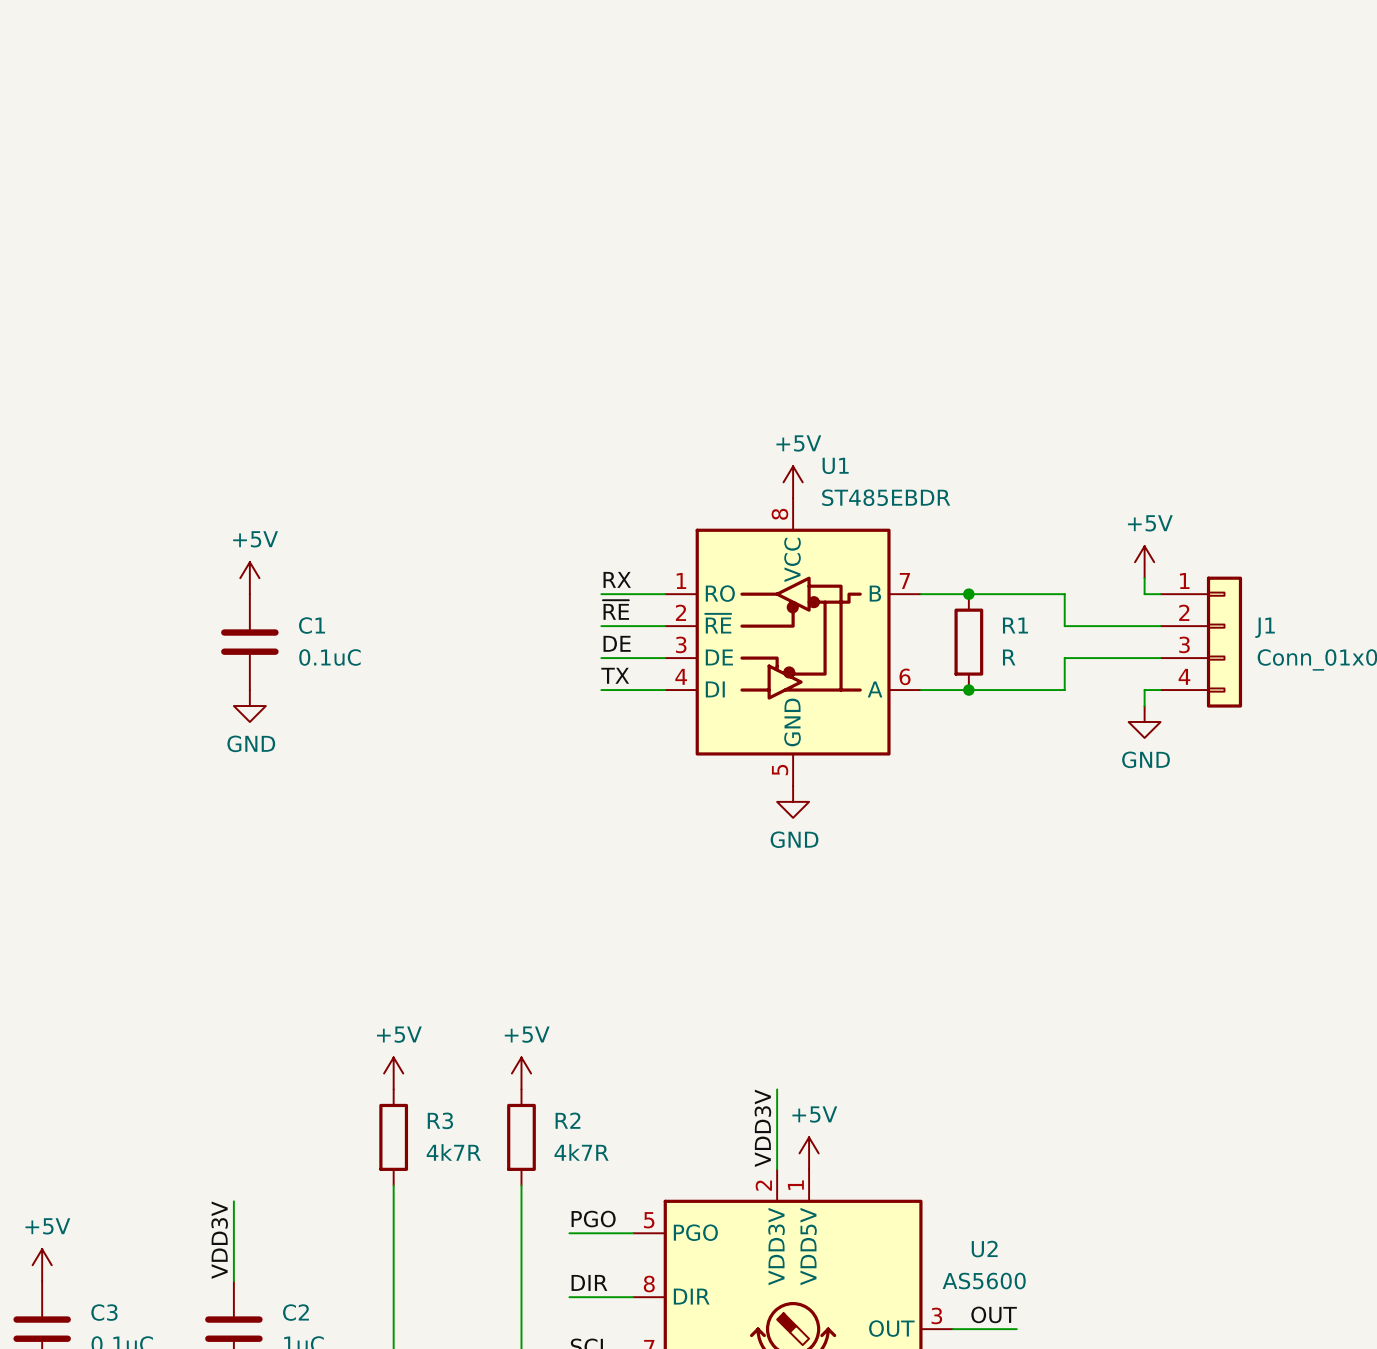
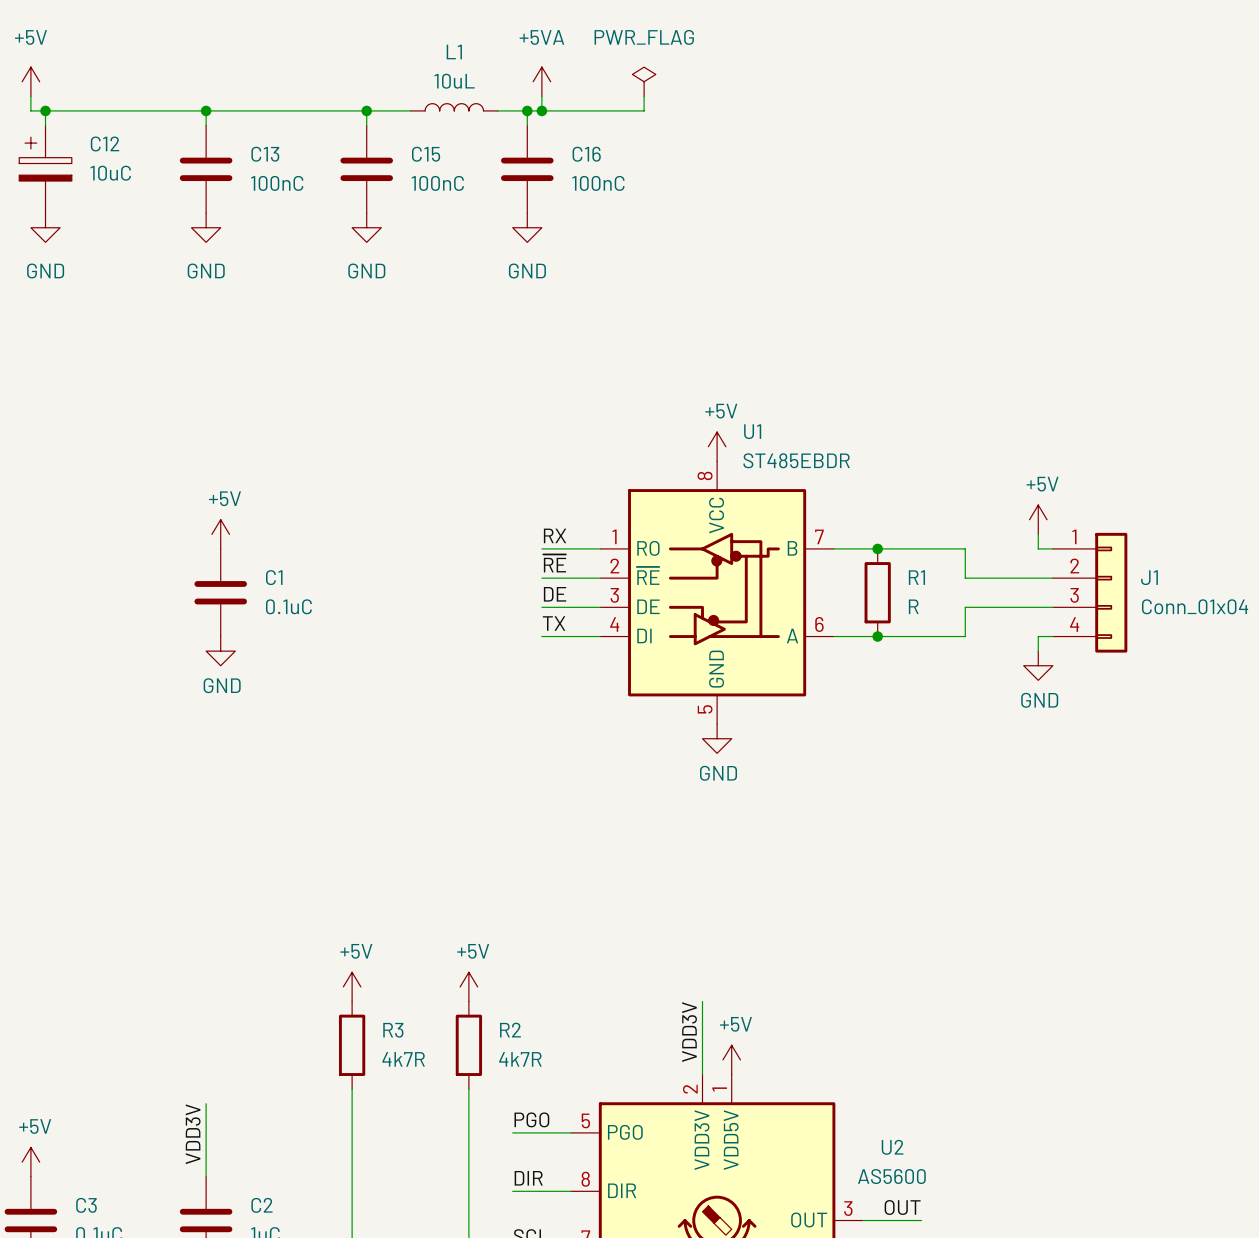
power symbol: none -> +5V (30, 81)
power symbol: none -> +5VA (541, 81)
power symbol: none -> PWR_FLAG (644, 81)
wire: none -> (30, 96) (30, 110) (410, 110)
wire: none -> (541, 96) (541, 110)
wire: none -> (644, 96) (644, 110) (498, 110)
L1: none -> 10uL (454, 107)
wire: none -> (45, 110) (45, 125)
junction: none -> (45, 110)
wire: none -> (206, 110) (206, 125)
junction: none -> (206, 110)
wire: none -> (366, 110) (366, 125)
junction: none -> (366, 110)
wire: none -> (527, 110) (527, 125)
junction: none -> (527, 110)
junction: none -> (541, 110)
C12: none -> 10uC (45, 169)
C13: none -> 100nC (206, 169)
C15: none -> 100nC (366, 169)
C16: none -> 100nC (527, 169)
power symbol: none -> GND (45, 227)
power symbol: none -> GND (206, 227)
power symbol: none -> GND (366, 227)
power symbol: none -> GND (527, 227)

